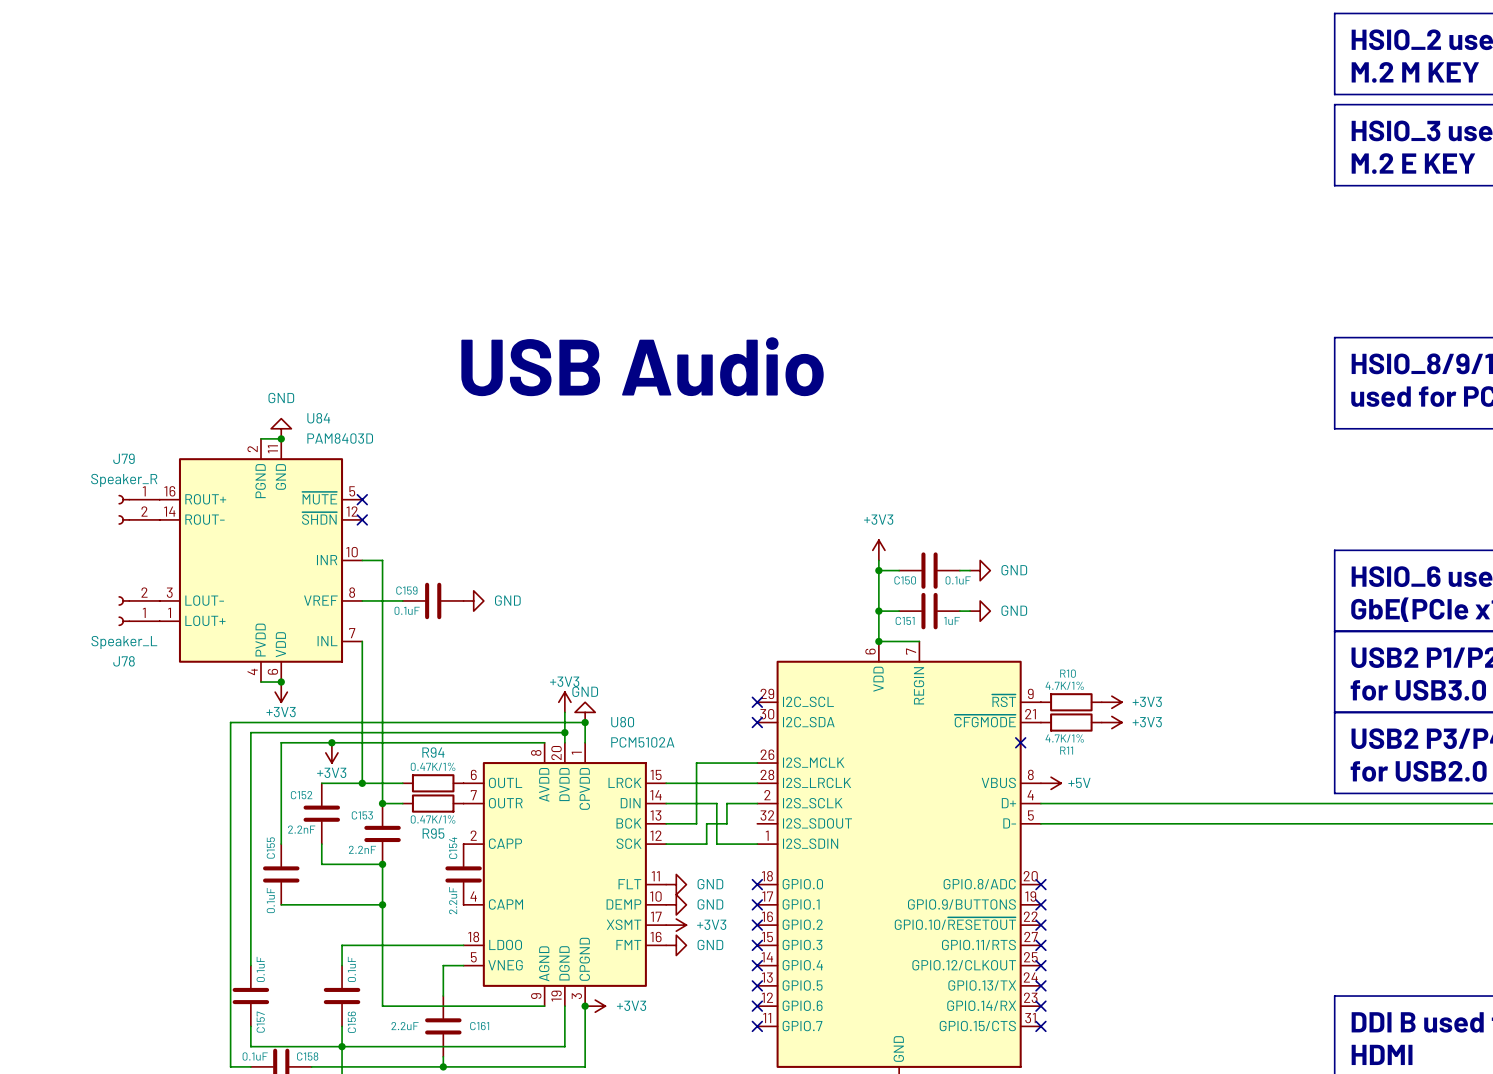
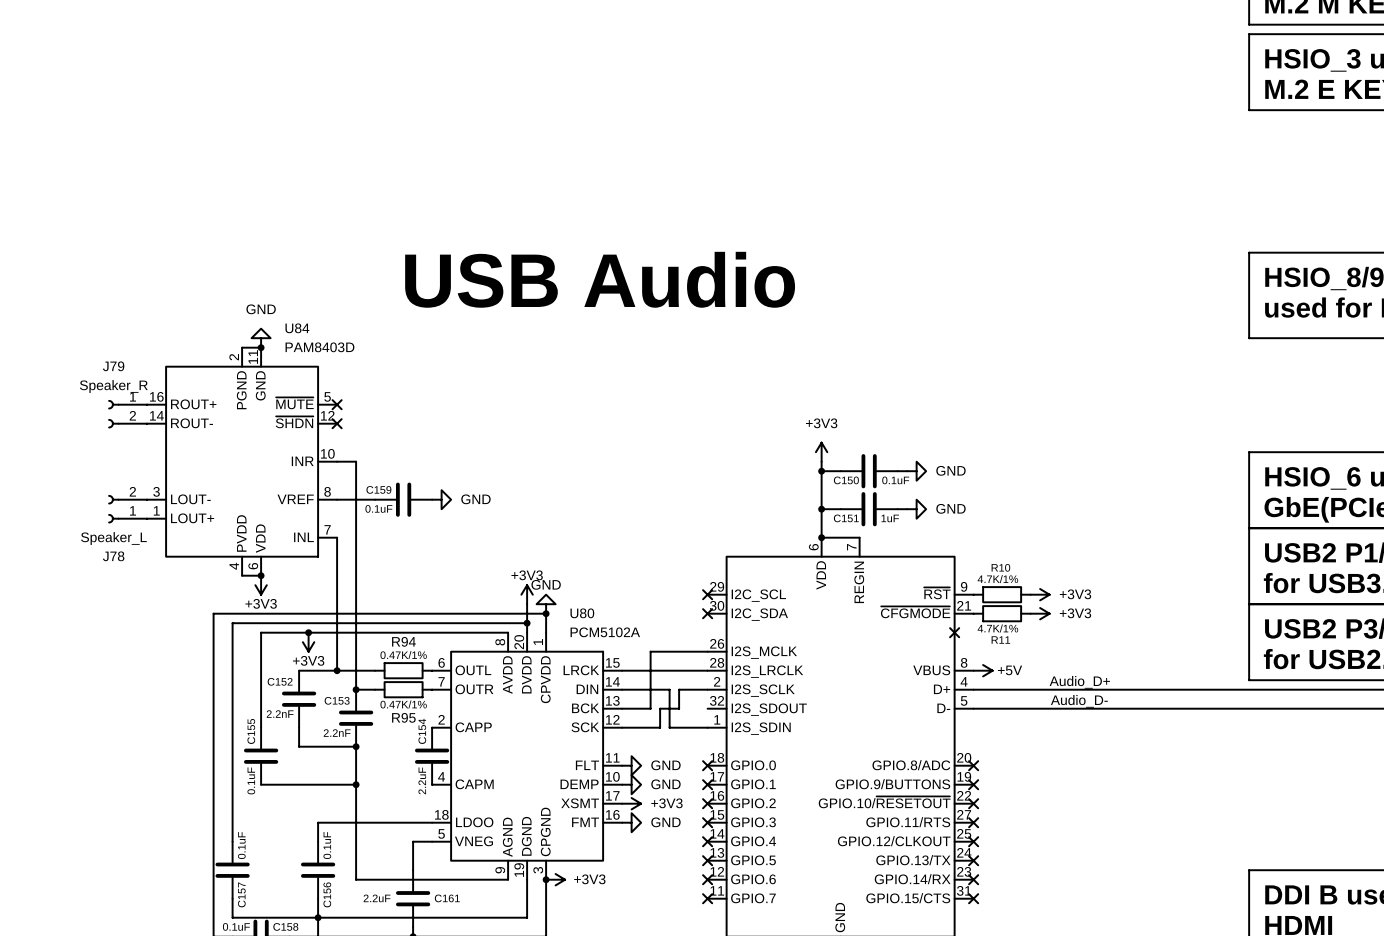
label: none -> Audio_D+ (1079, 682)
label: none -> Audio_D- (1079, 701)

